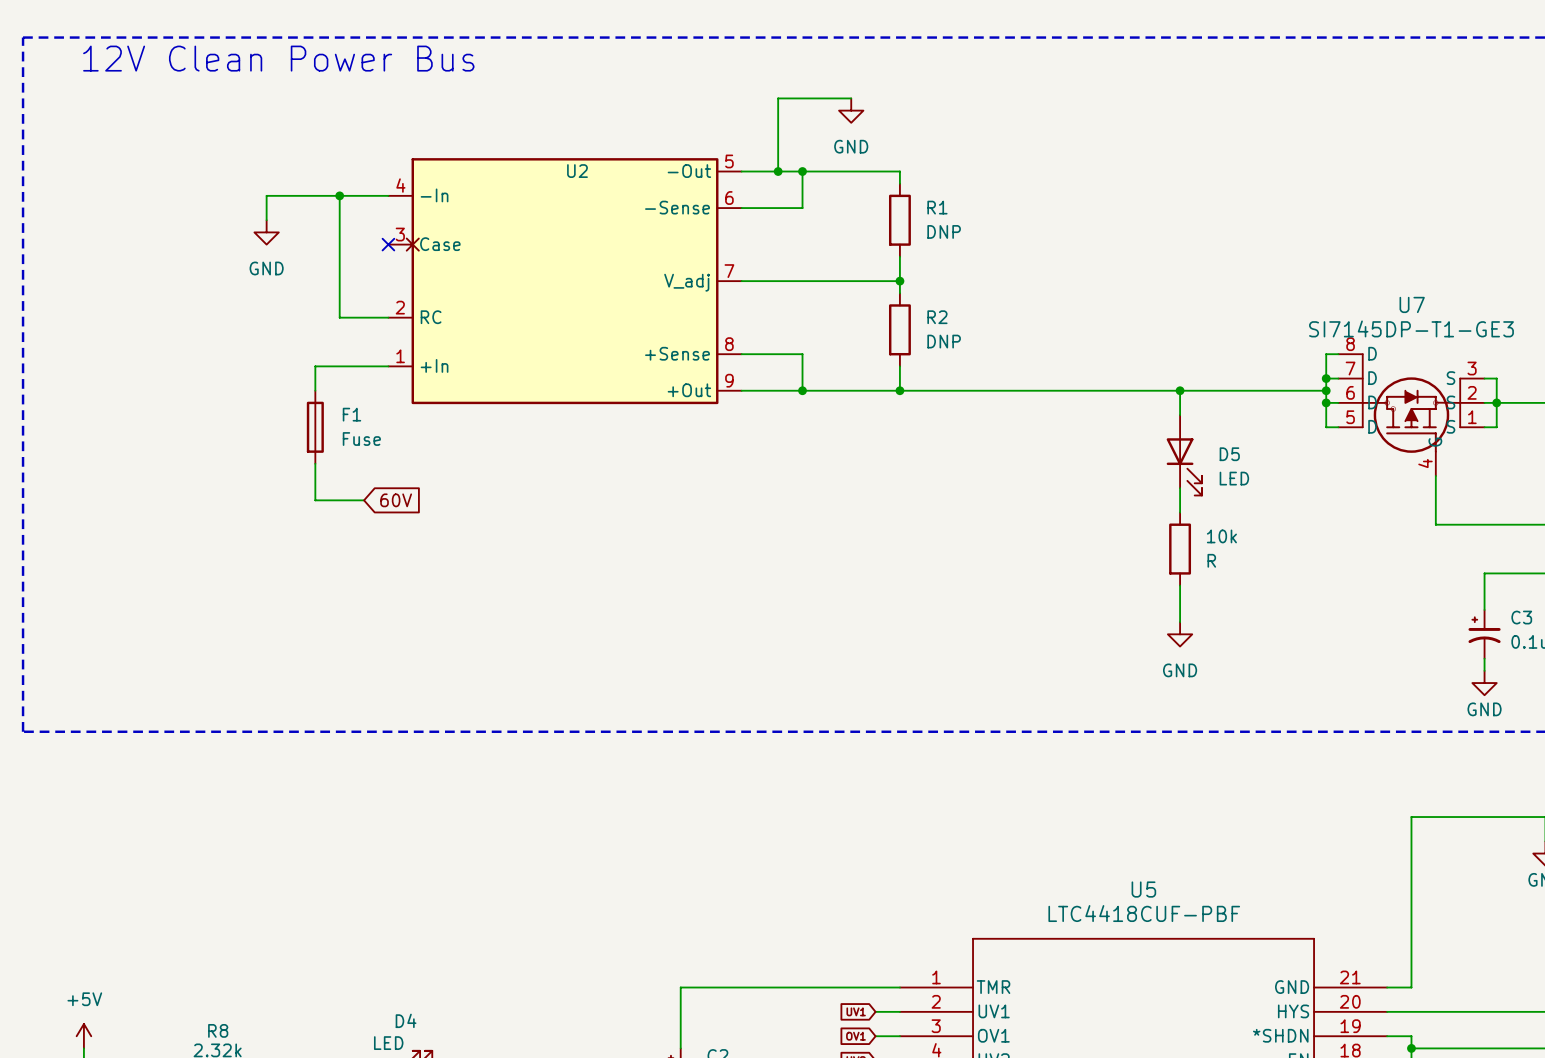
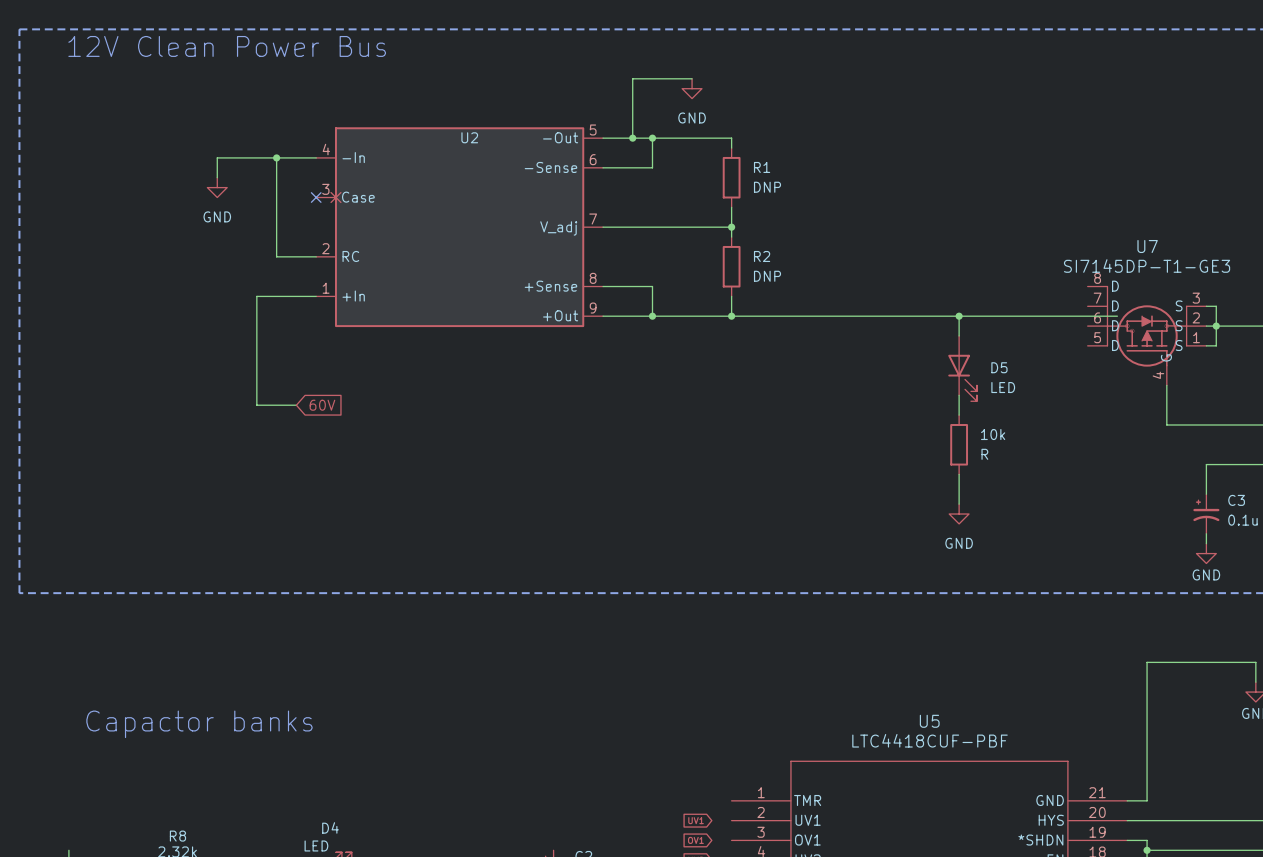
wire: (1338, 354) (1326, 354) (1326, 427) (1338, 427) -> none
wire: (1326, 378) (1338, 378) -> none
junction: (1326, 378) -> none
wire: none -> (1077, 316) (1117, 316)
junction: (1326, 390) -> none
wire: (1326, 402) (1338, 402) -> none
junction: (1326, 402) -> none
F1: Fuse (315, 427) -> none
text: none -> Capactor banks (199, 724)
wire: (899, 987) (680, 987) (680, 1048) -> none
wire: (875, 1011) (899, 1011) -> none
power symbol: +5V (83, 1036) -> none
wire: (875, 1036) (899, 1036) -> none

